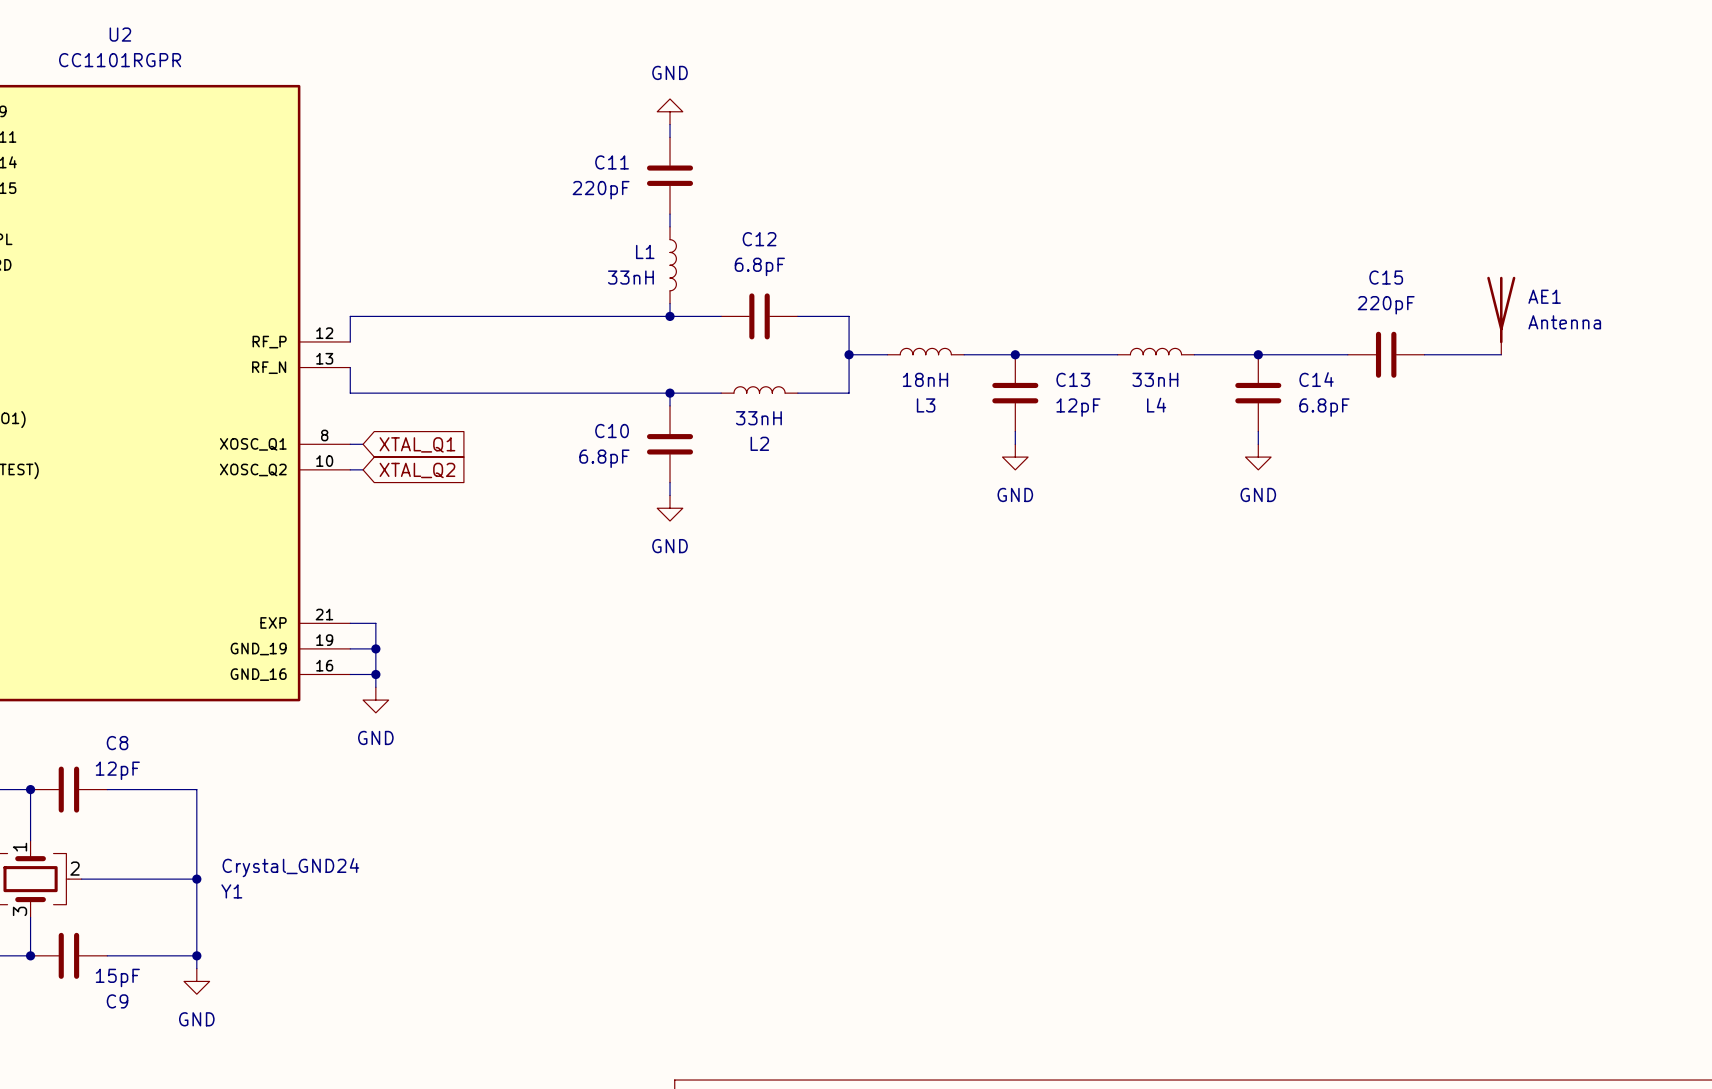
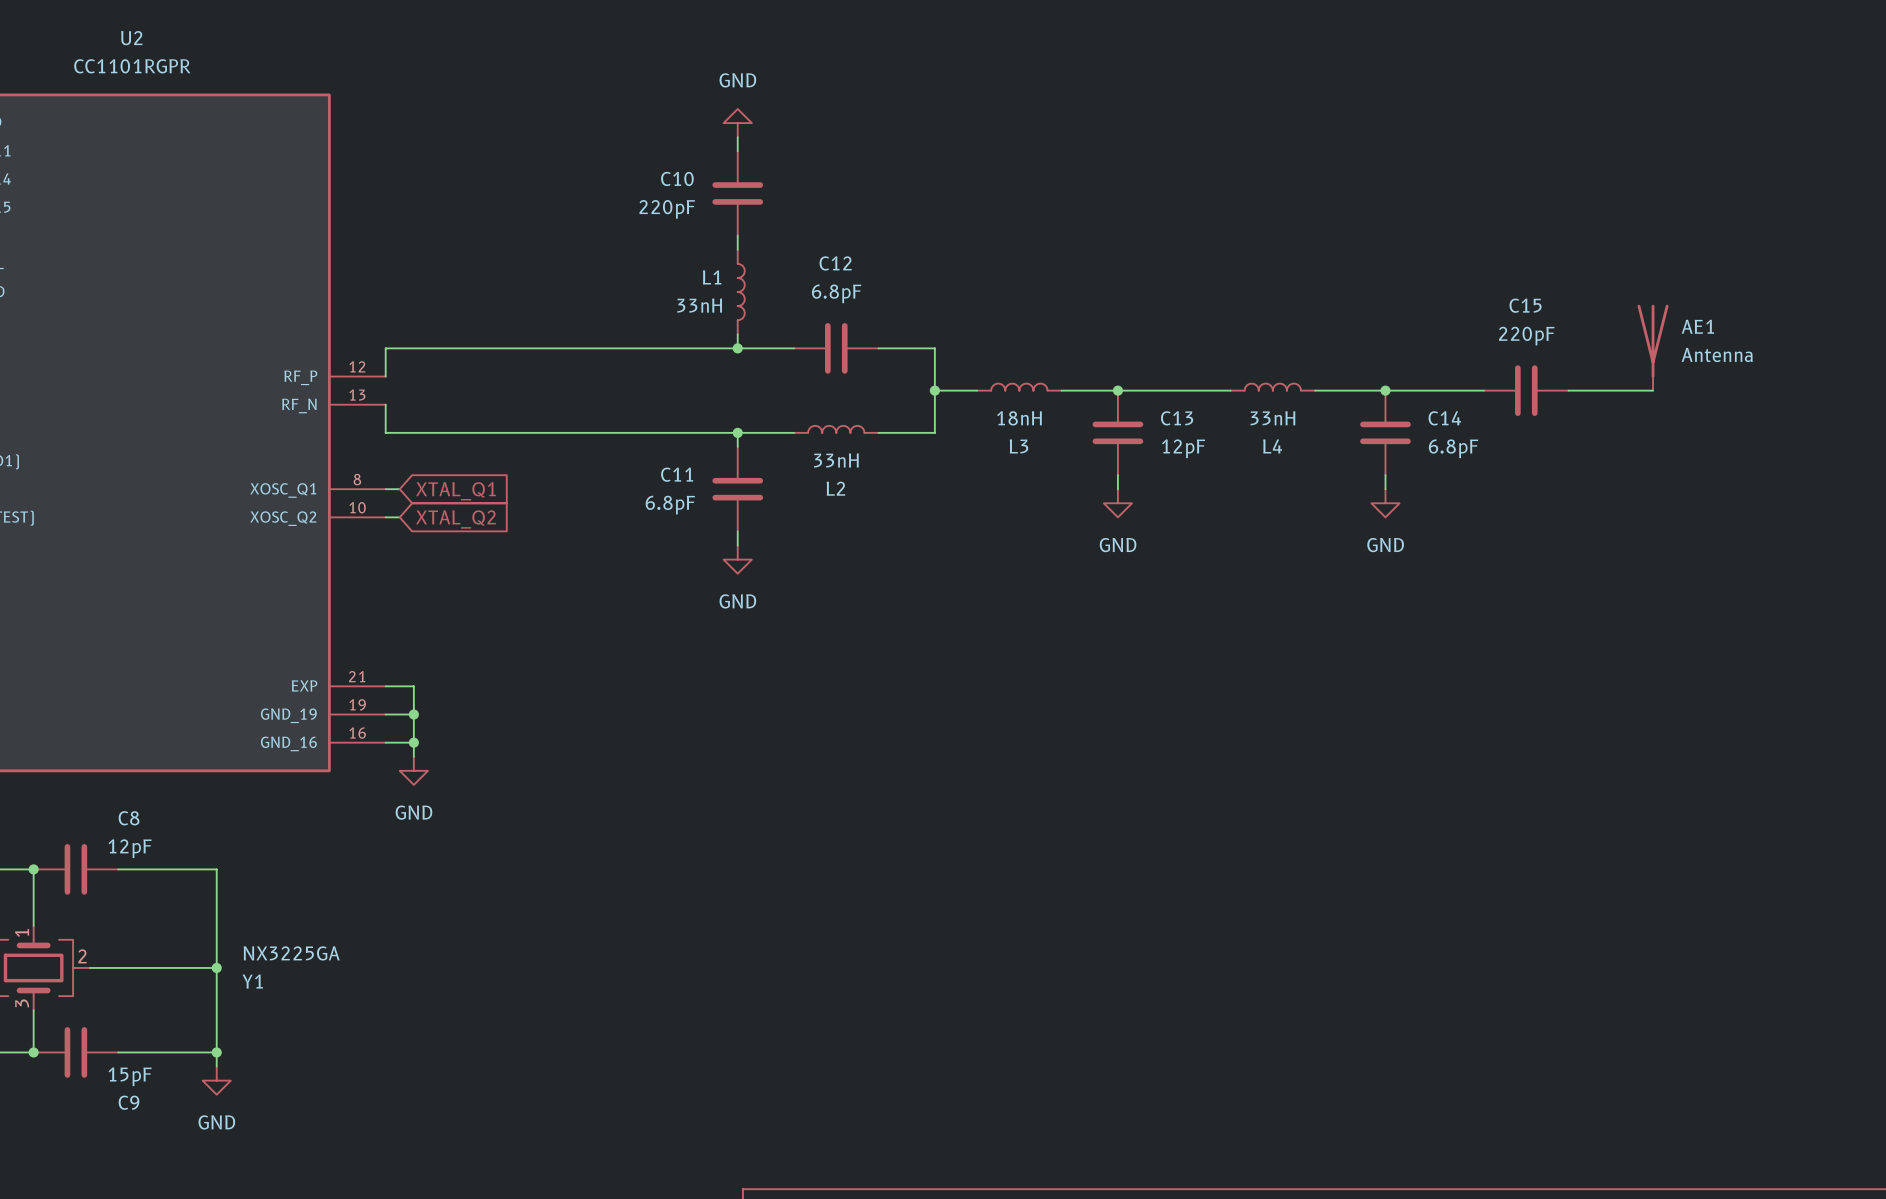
C11 name: C11 (612, 162) -> C10 (677, 178)
C10 name: C10 (612, 431) -> C11 (677, 474)
Y1 value: Crystal_GND24 (290, 867) -> NX3225GA (291, 953)

